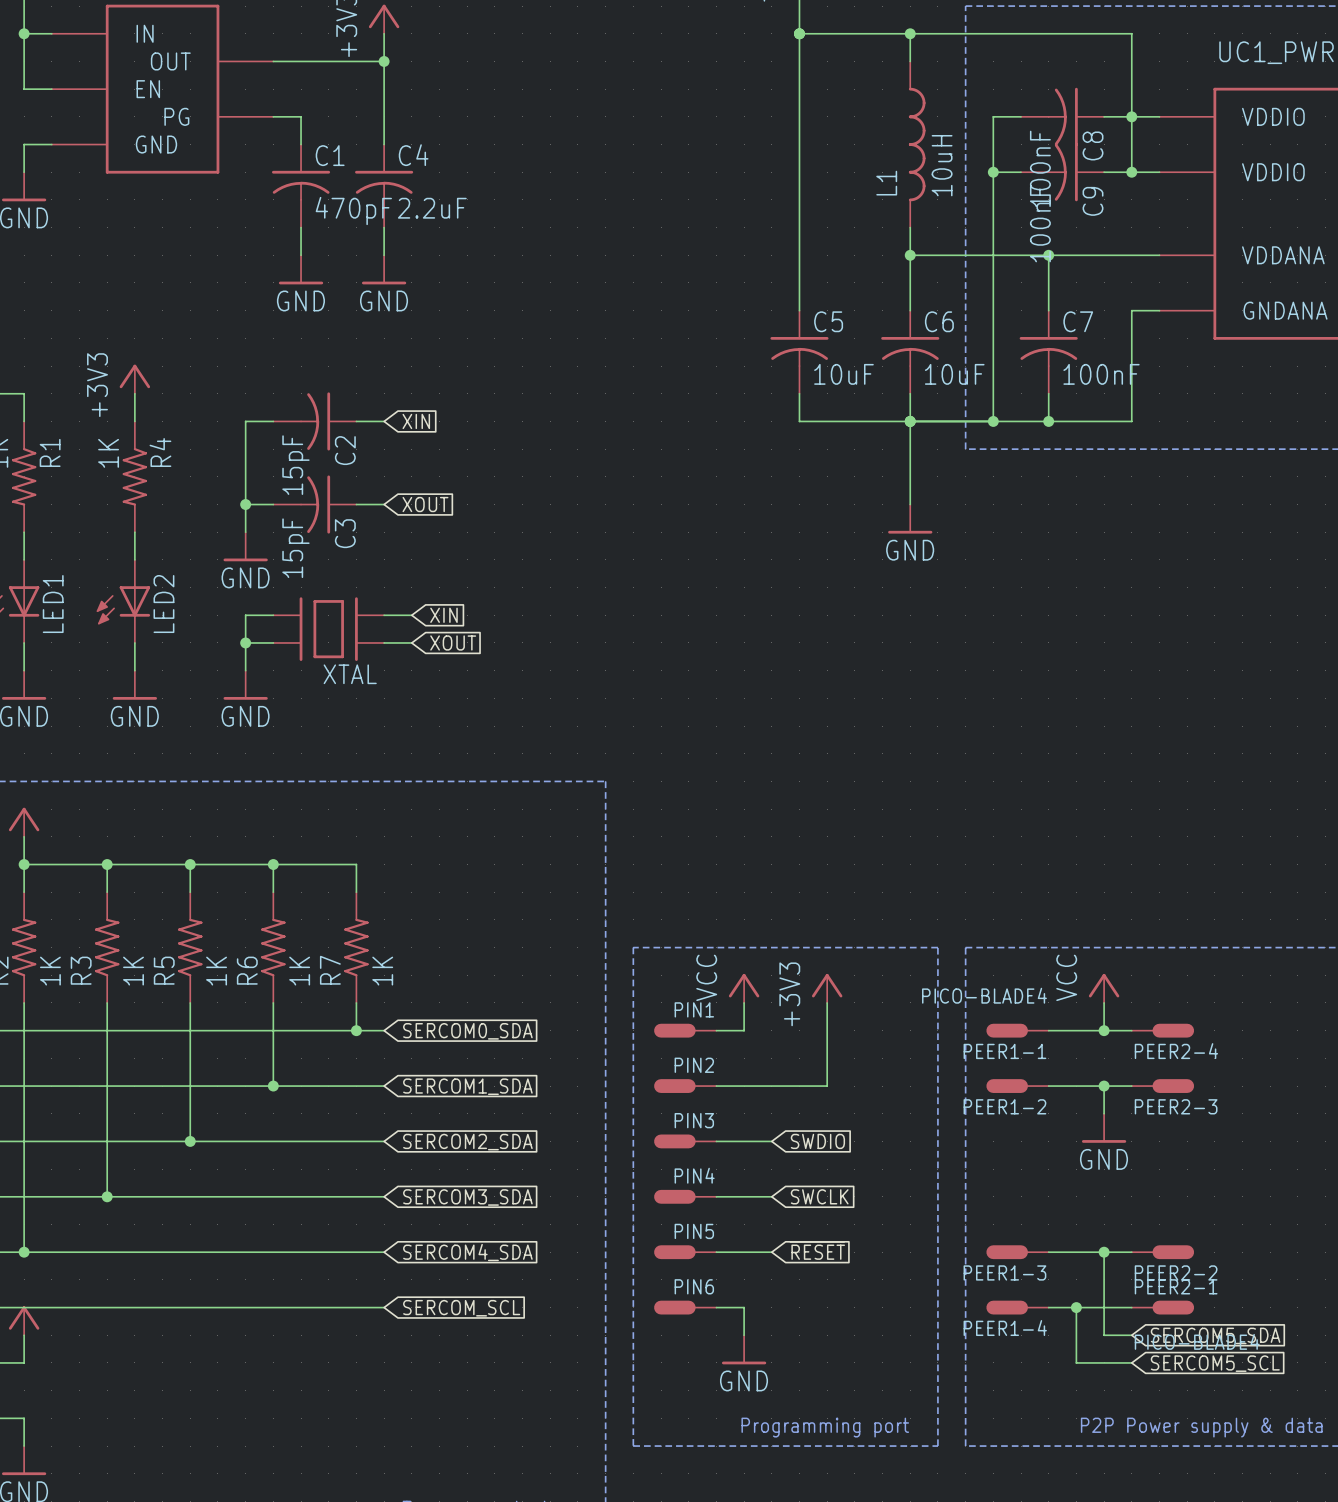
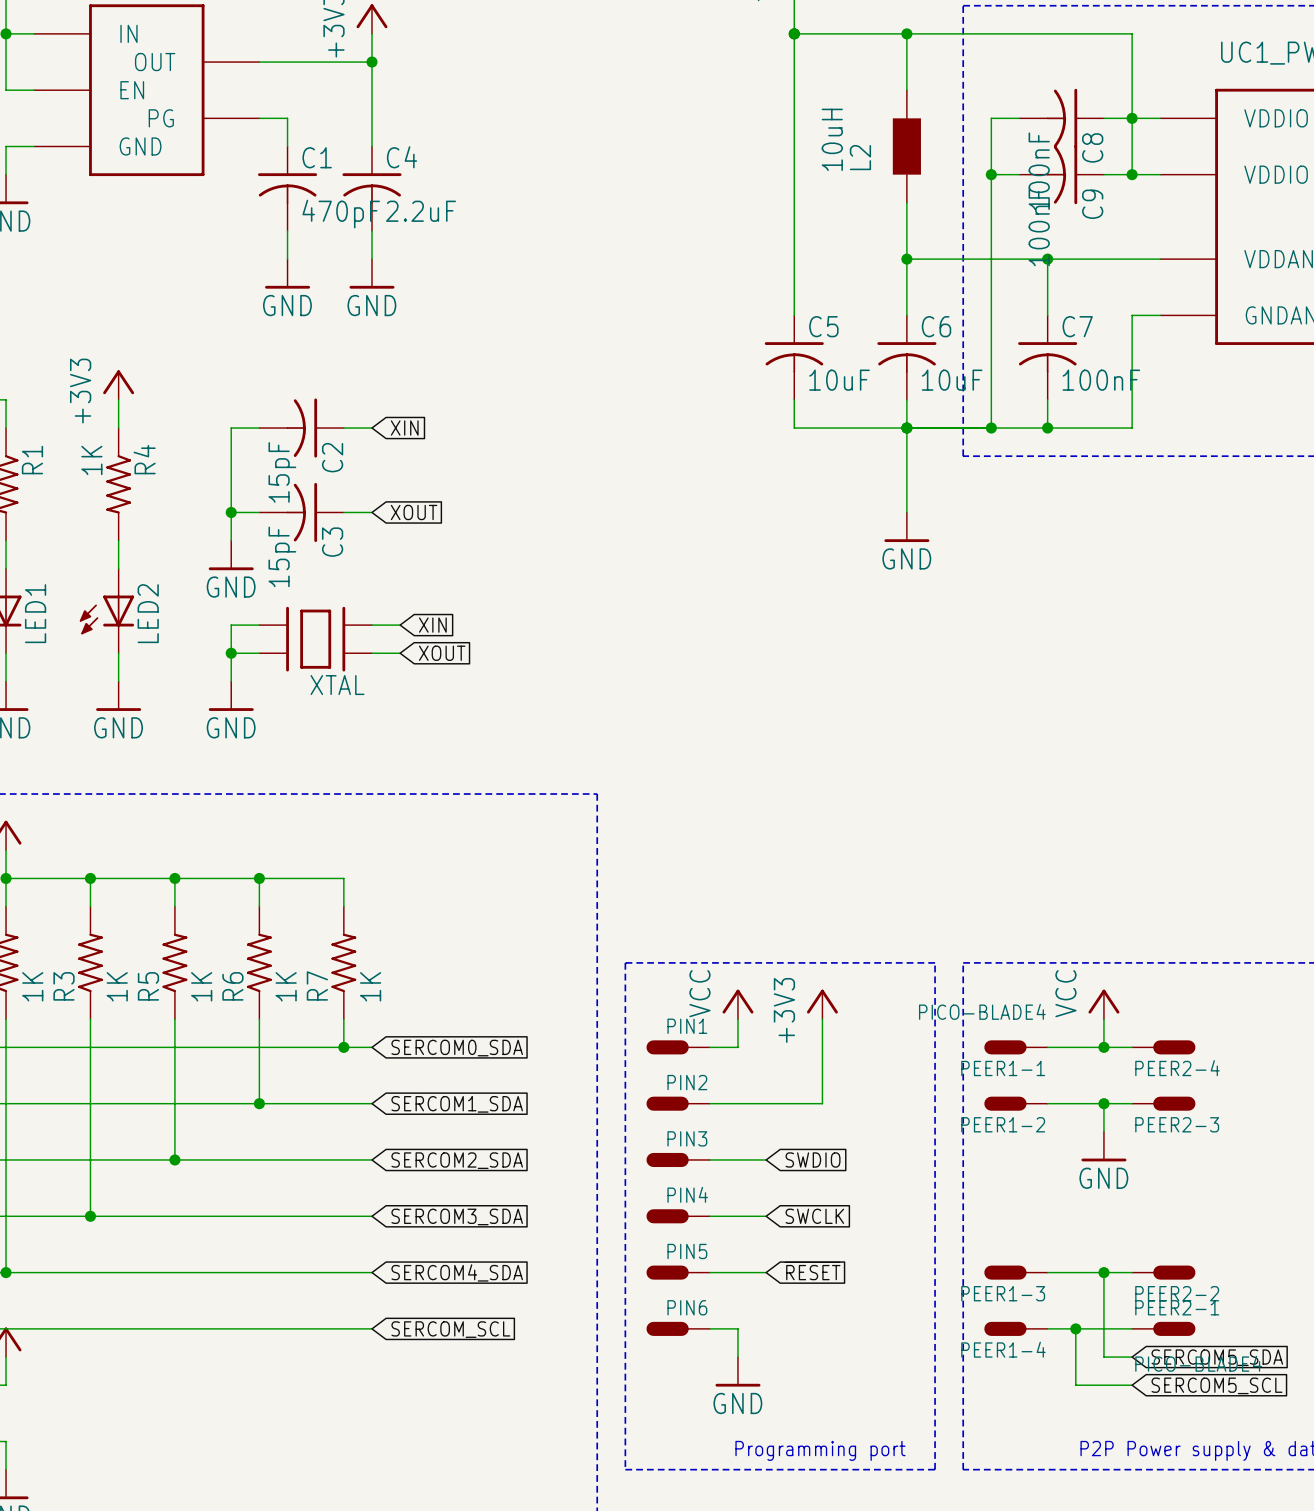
L2: none -> 10uH (906, 146)
L1: 10uH (917, 144) -> none

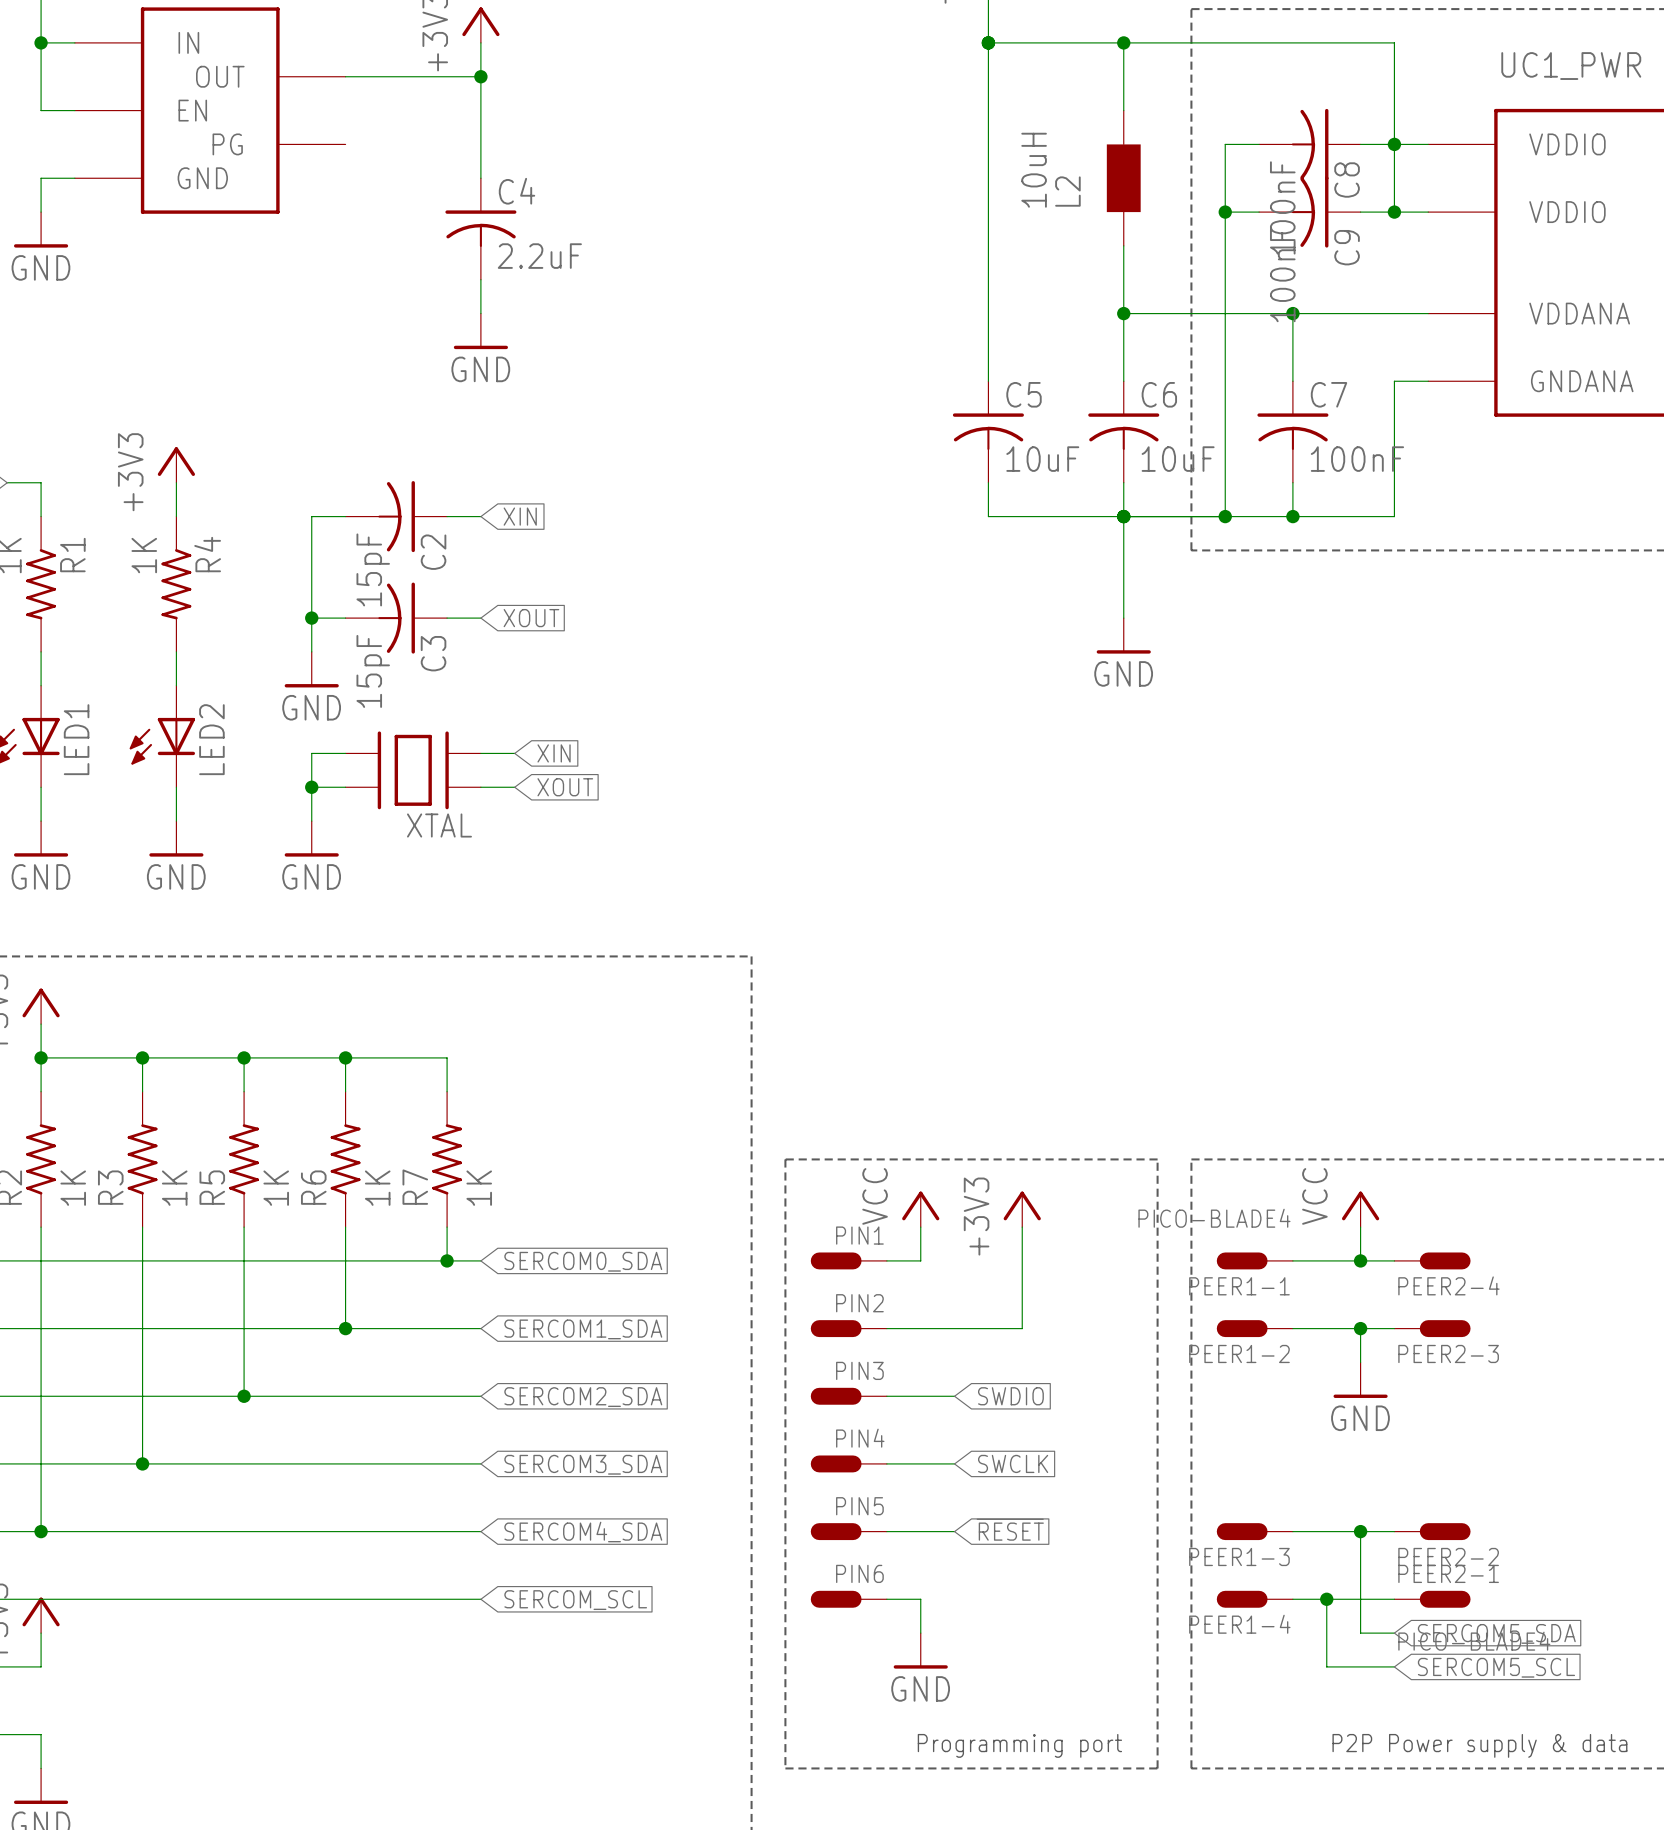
wire: (259, 118) (287, 118) (287, 146) -> none
C1: 470pF (287, 188) -> none
wire: (287, 230) (287, 259) -> none
power symbol: GND (287, 273) -> none

